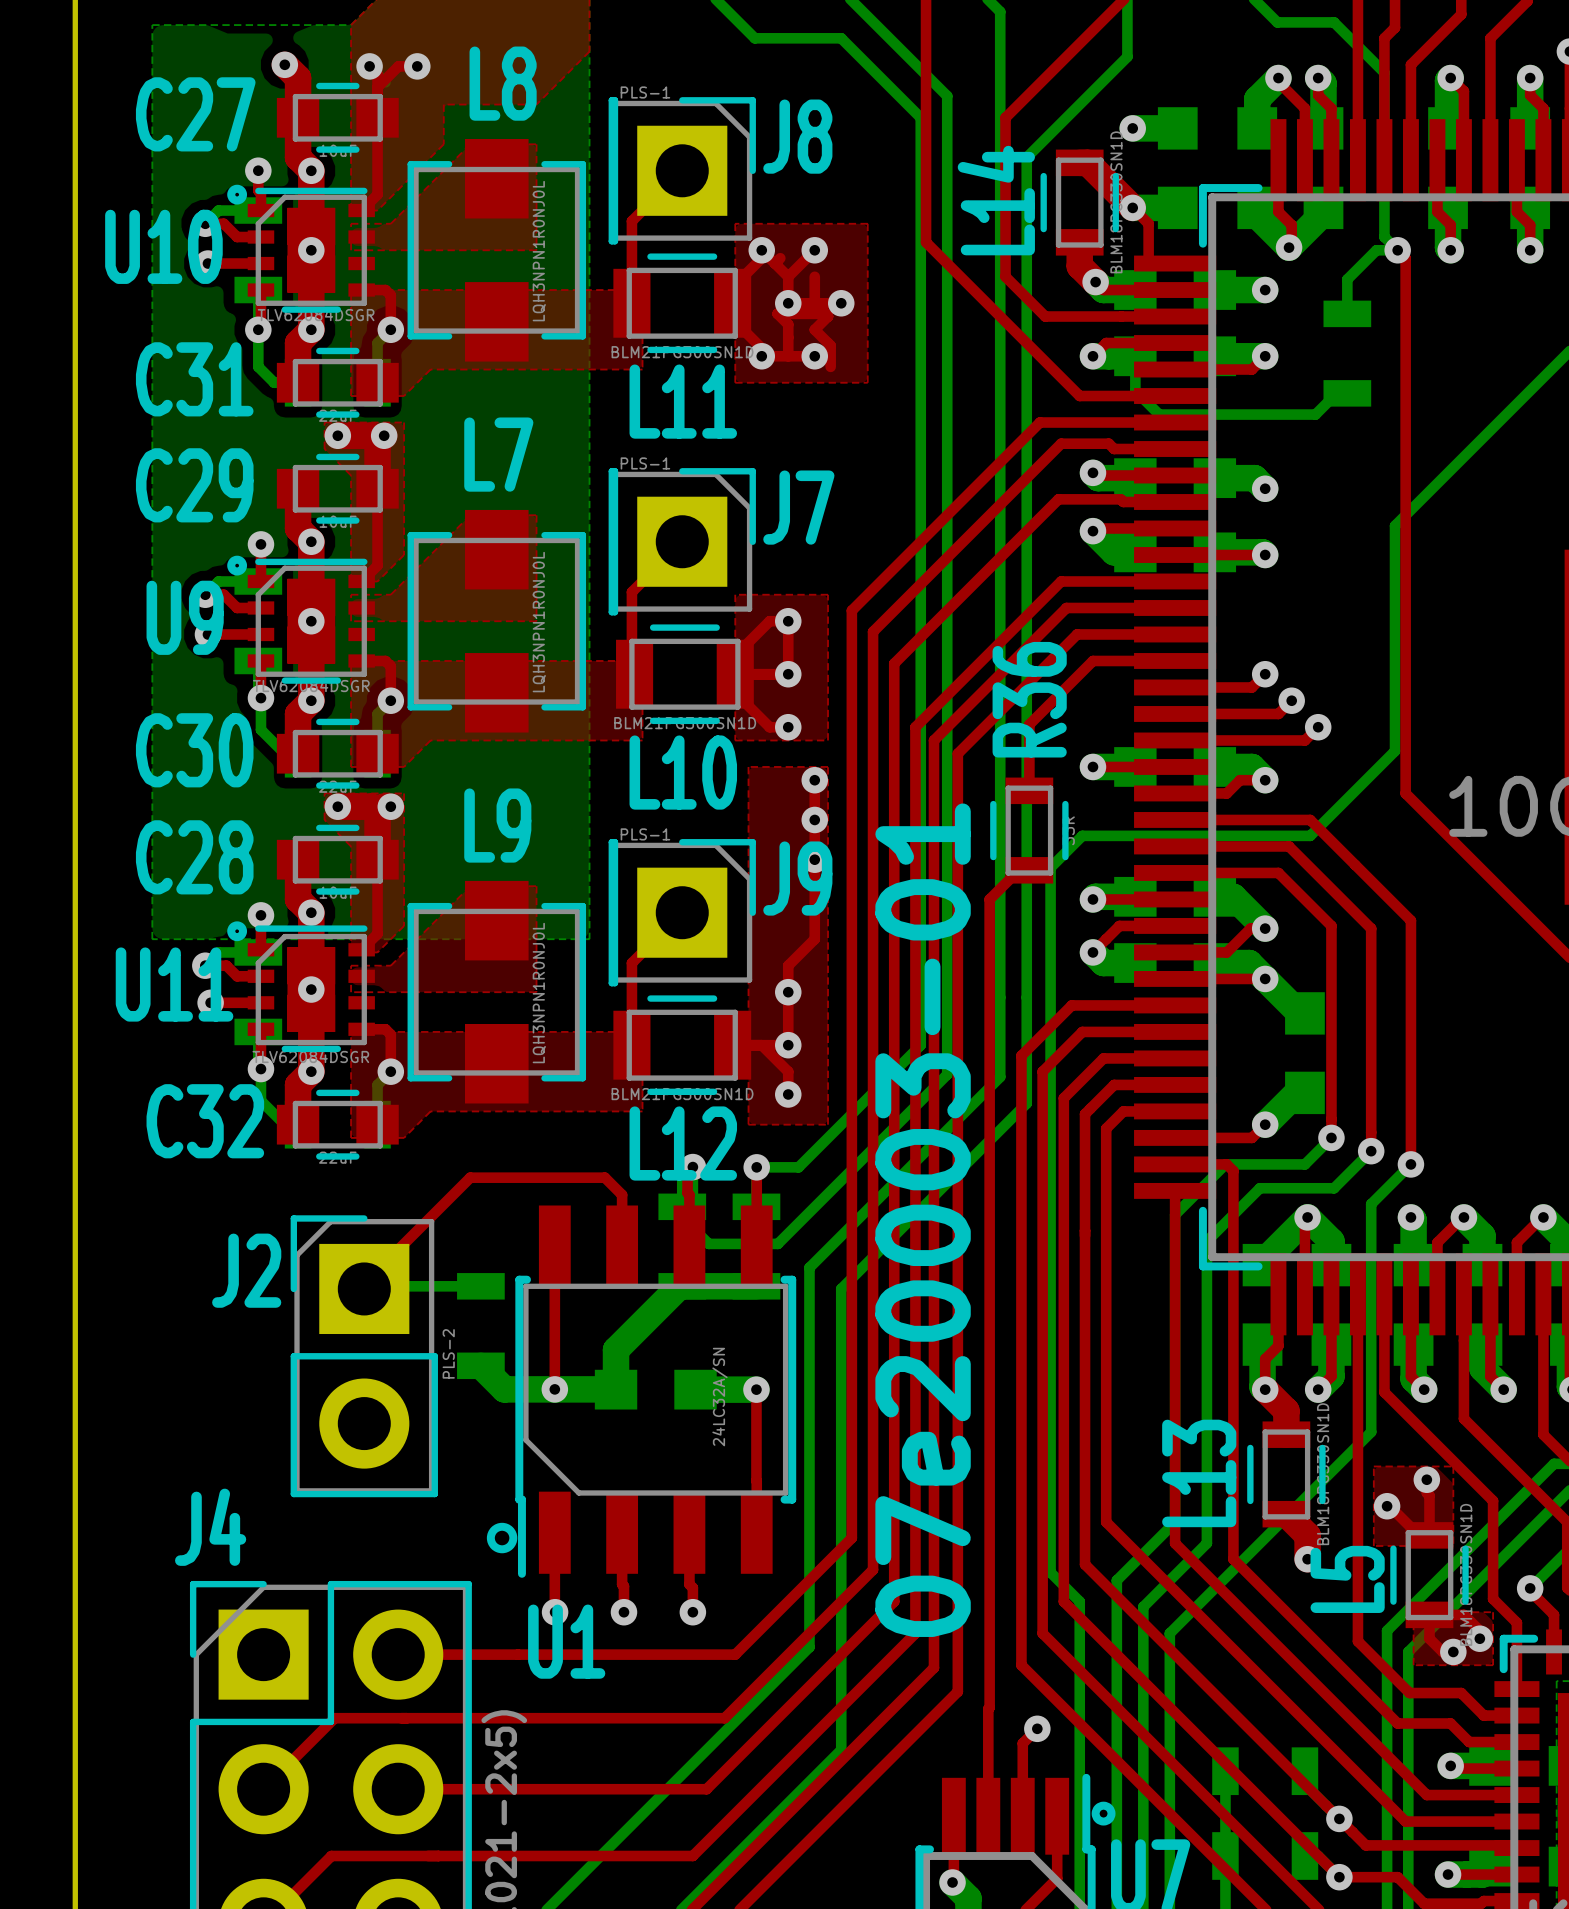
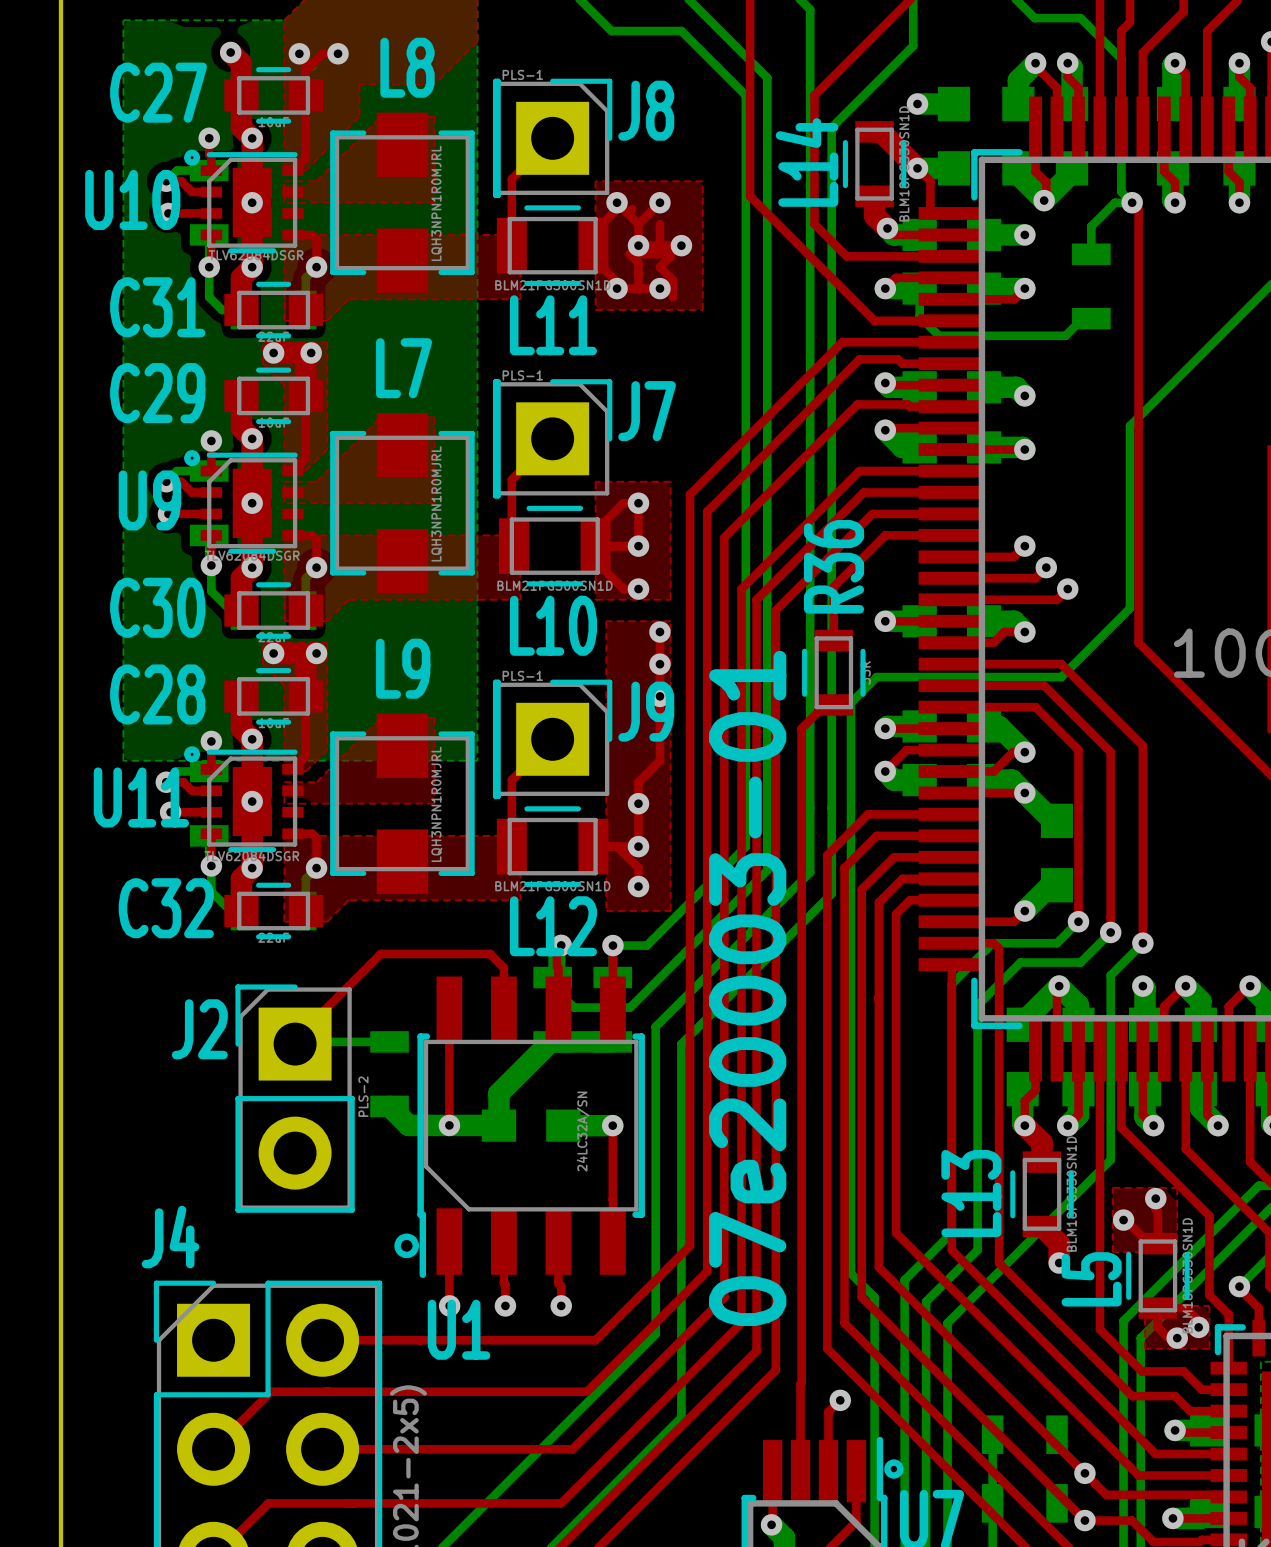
L8 value: LQH3NPN1R0NJ0L (539, 251) -> LQH3NPN1R0MJRL (436, 203)
L7 value: LQH3NPN1R0NJ0L (539, 622) -> LQH3NPN1R0MJRL (436, 503)
L9 value: LQH3NPN1R0NJ0L (539, 993) -> LQH3NPN1R0MJRL (436, 804)

